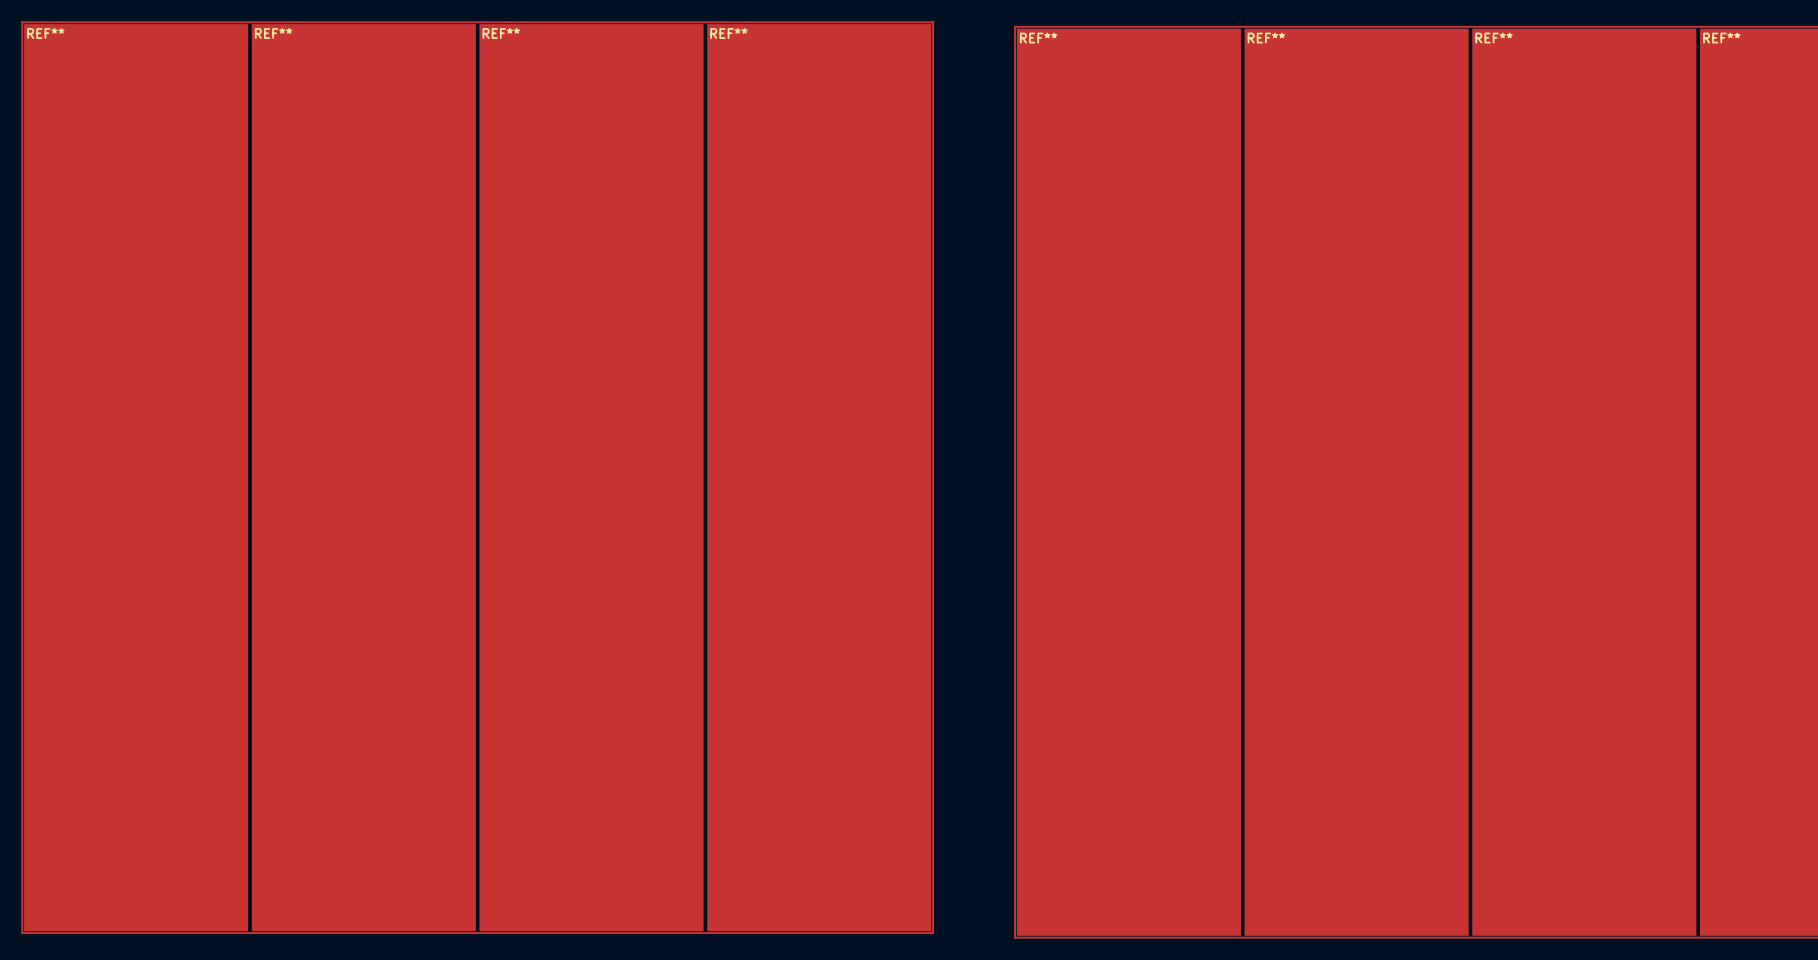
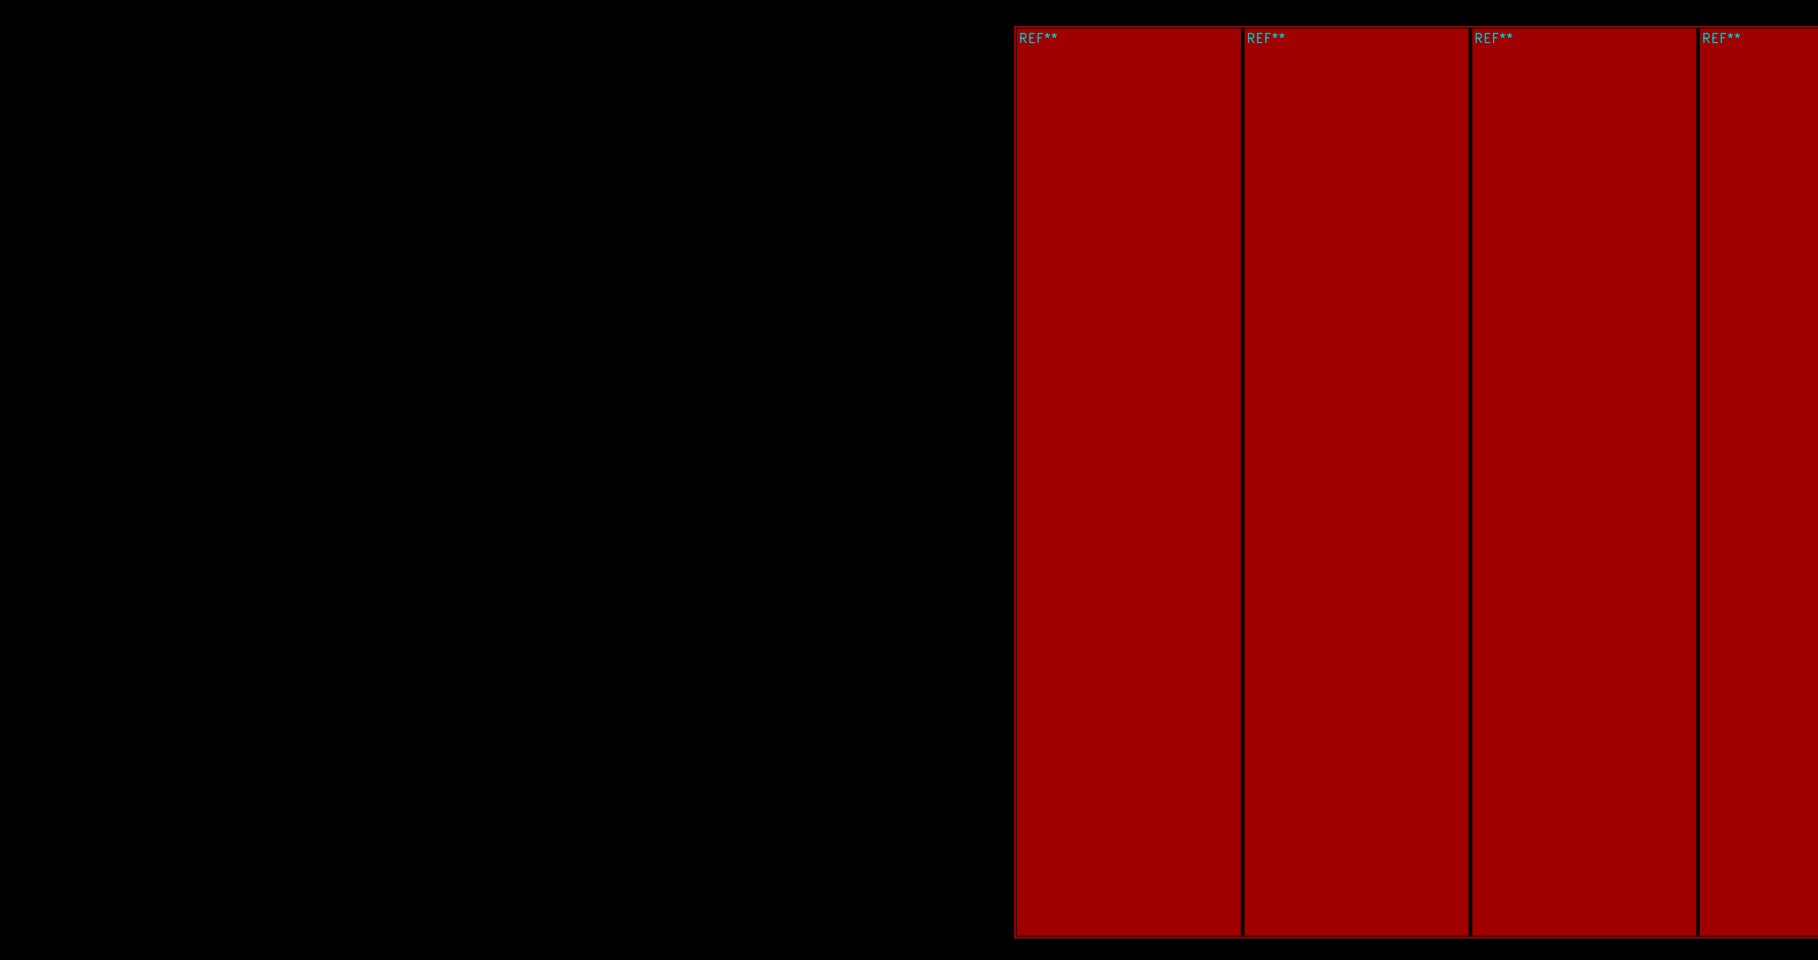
top track: (22, 22) (933, 22) (933, 933) (22, 933) (22, 22) -> none
REF**: (136, 477) -> none
REF**: (363, 477) -> none
REF**: (591, 477) -> none
REF**: (819, 477) -> none

